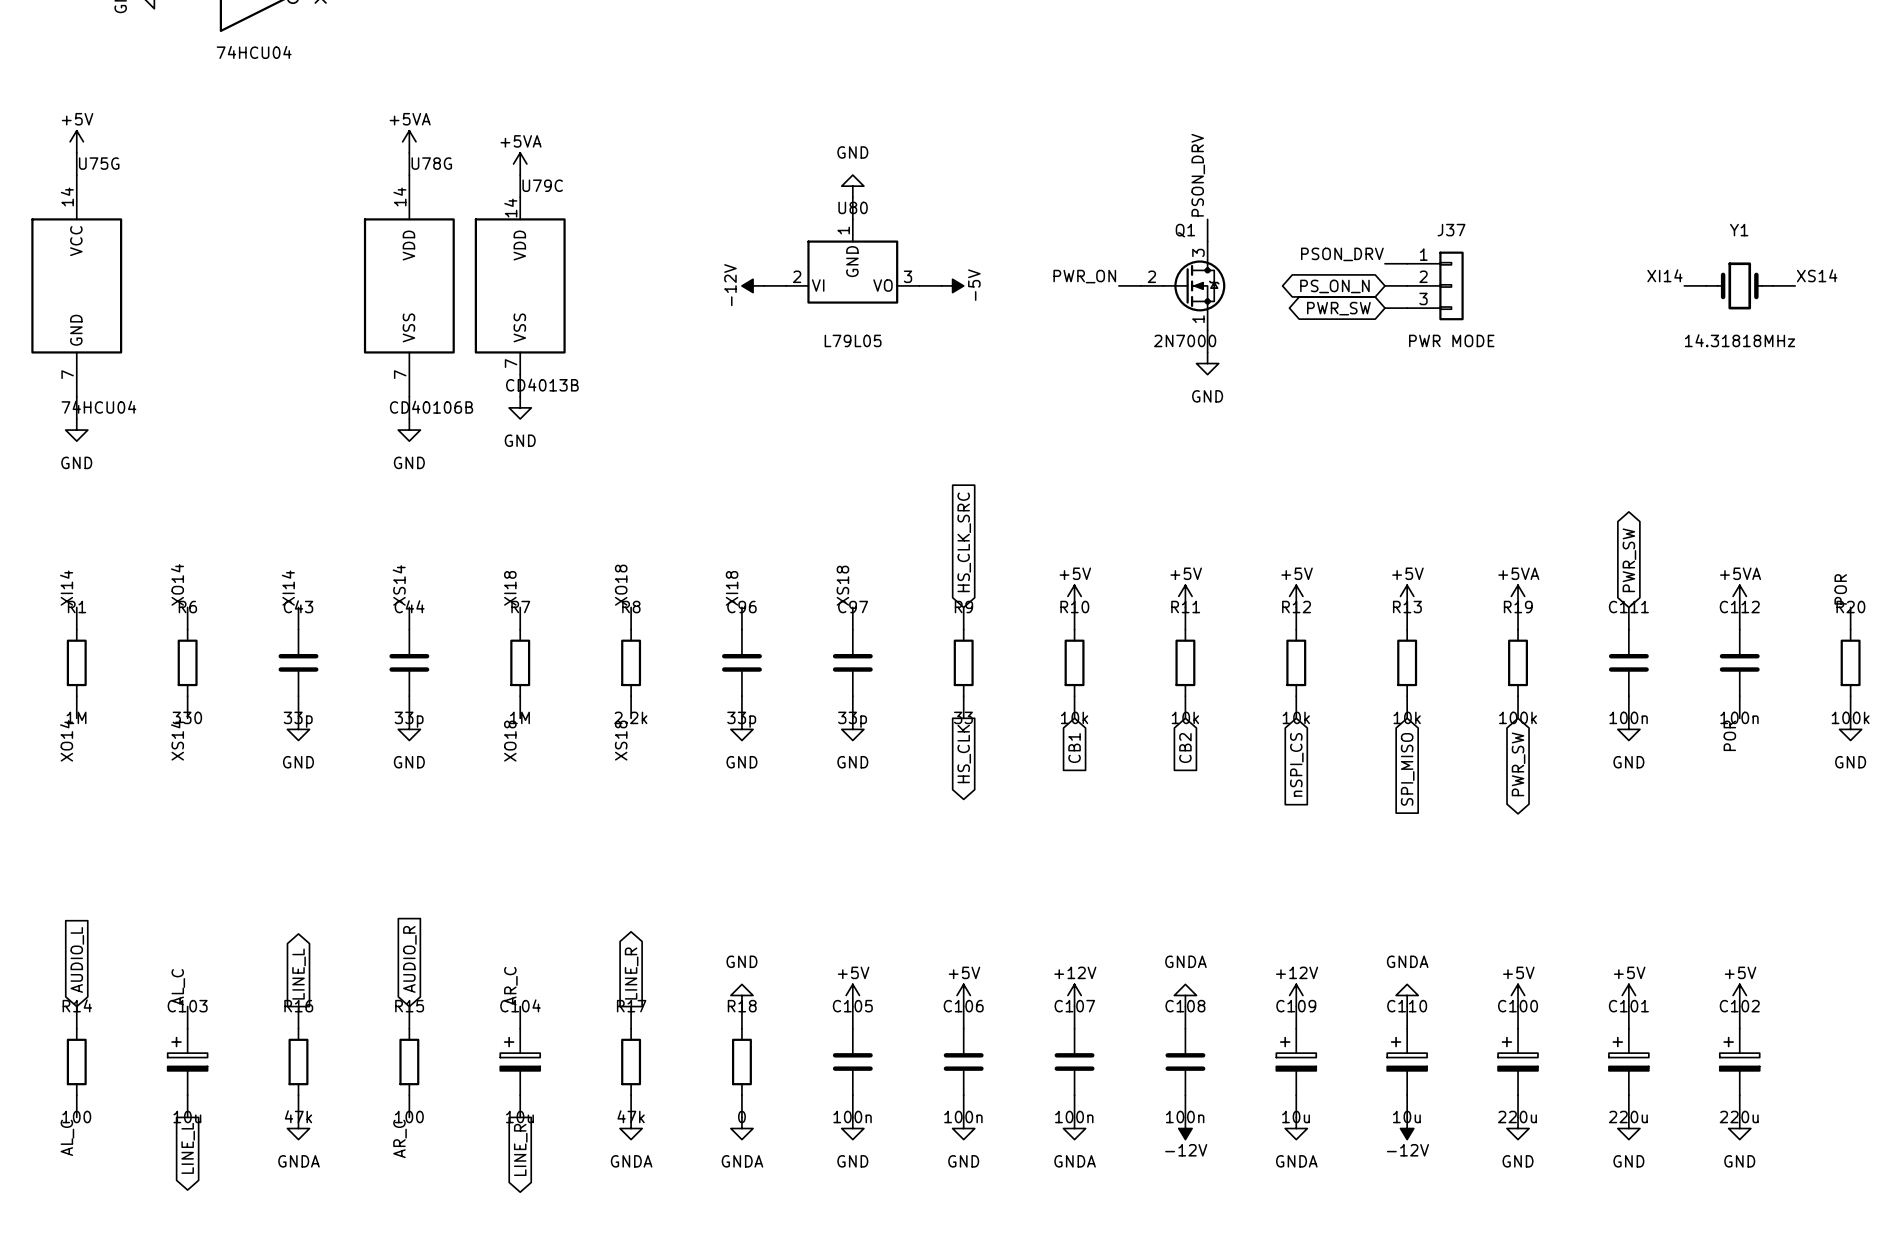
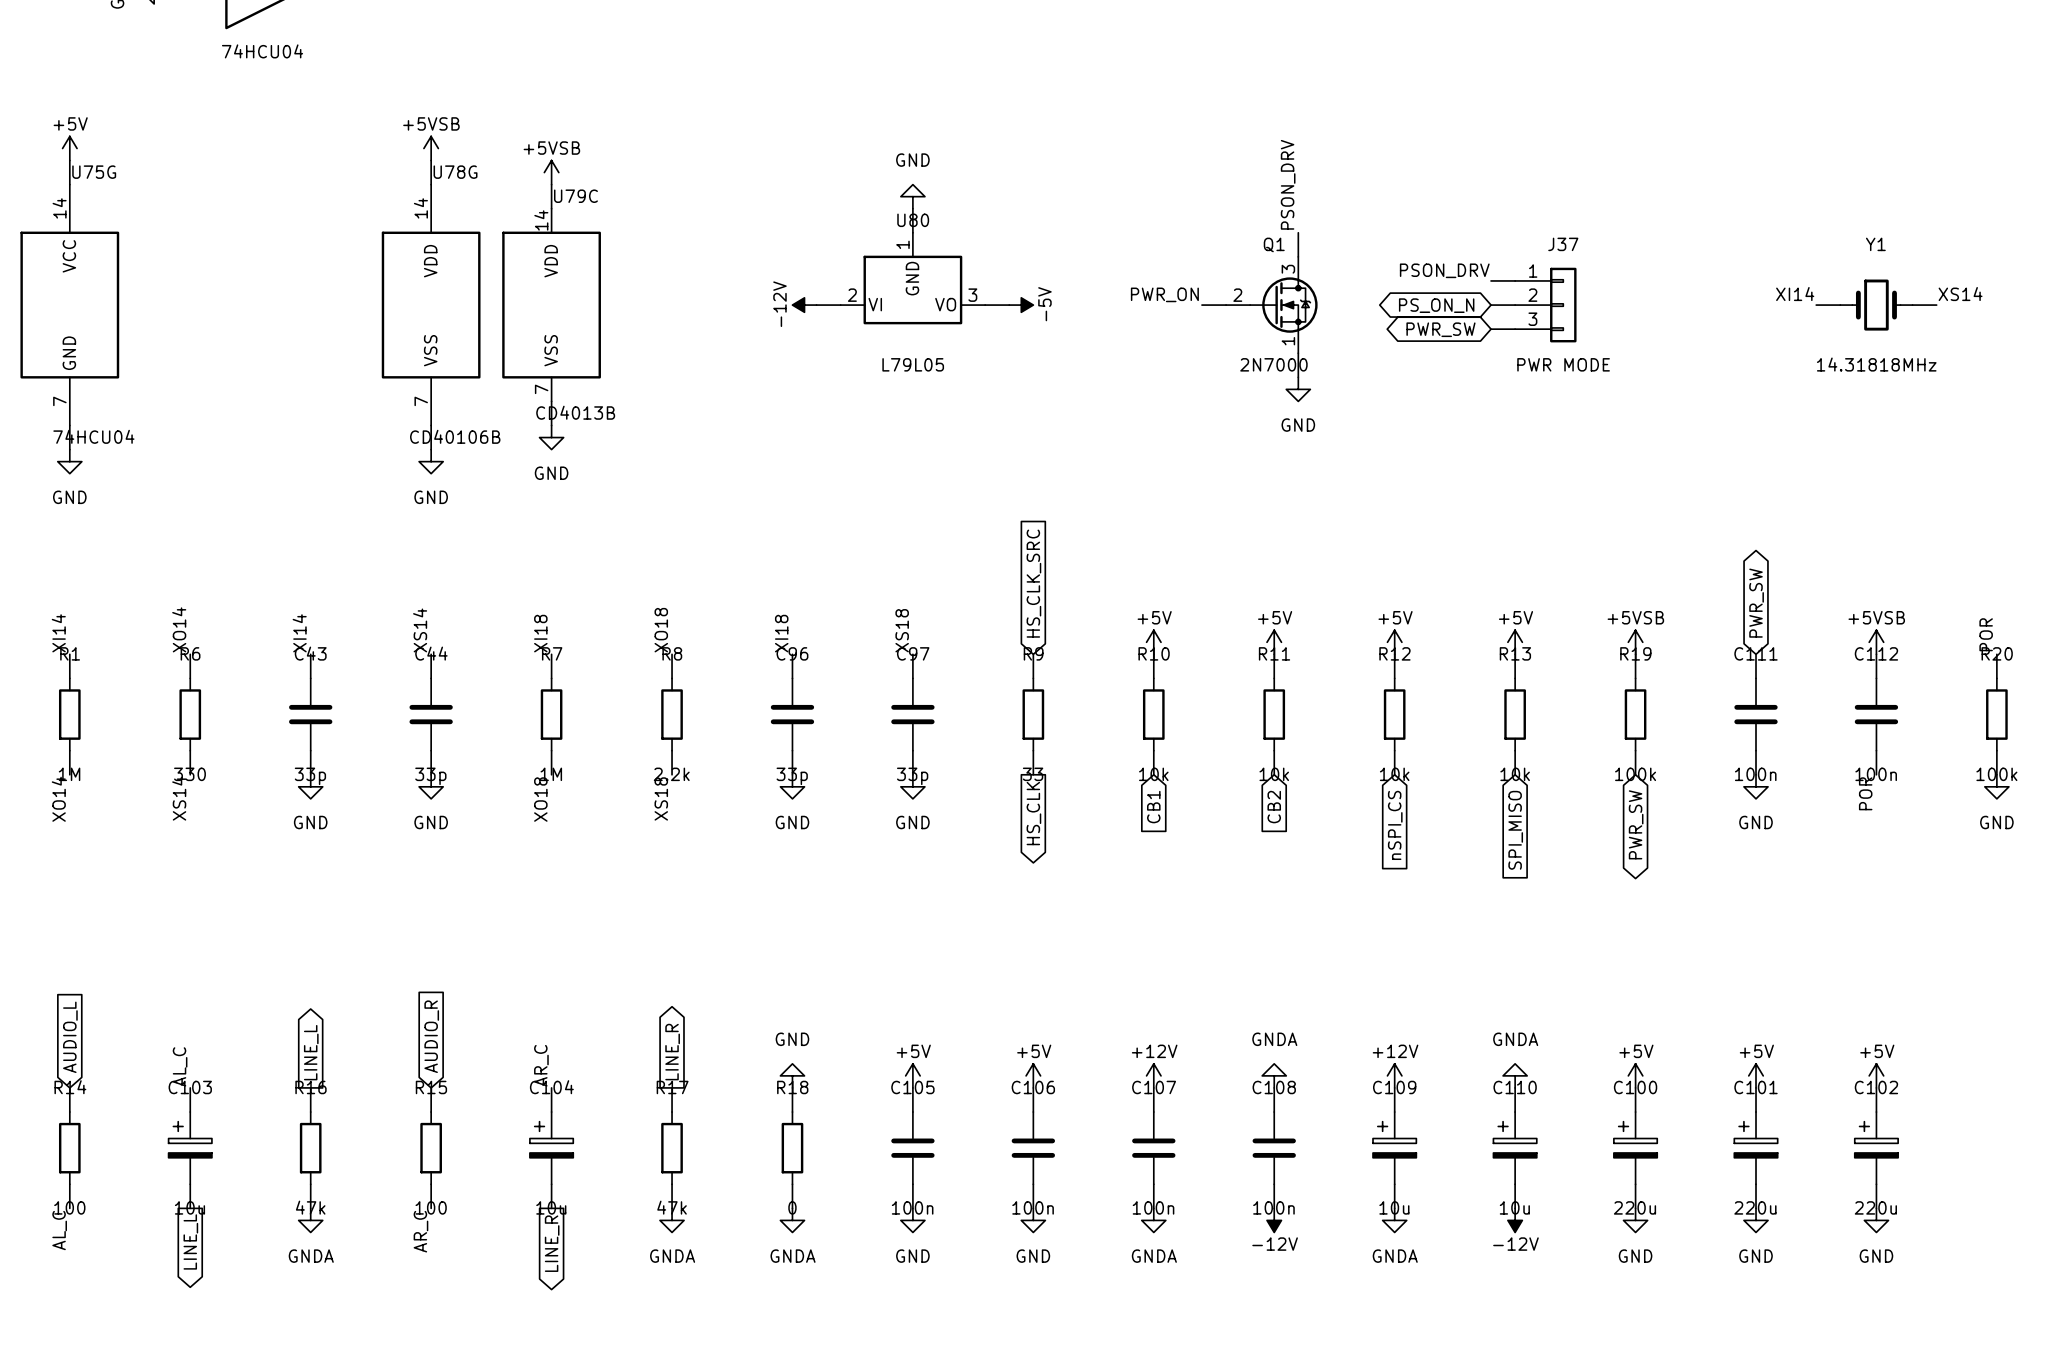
power symbol: +5VA (409, 141) -> +5VSB (431, 148)
power symbol: +5VA (520, 163) -> +5VSB (551, 172)
power symbol: +5VA (1518, 596) -> +5VSB (1635, 642)
power symbol: +5VA (1739, 596) -> +5VSB (1876, 642)

